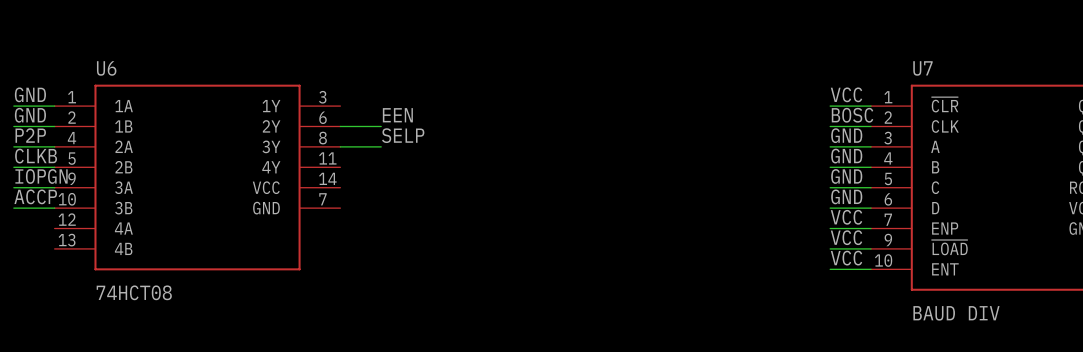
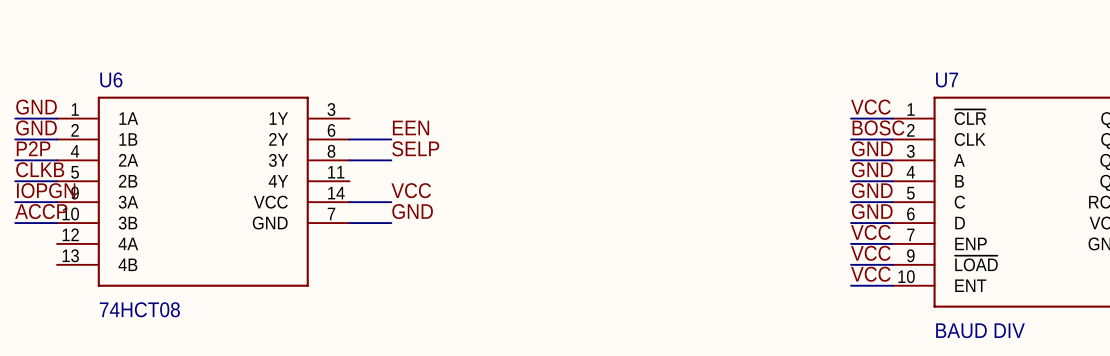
label: none -> VCC (411, 190)
wire: none -> (349, 202) (391, 202)
label: none -> GND (412, 211)
wire: none -> (349, 223) (391, 223)

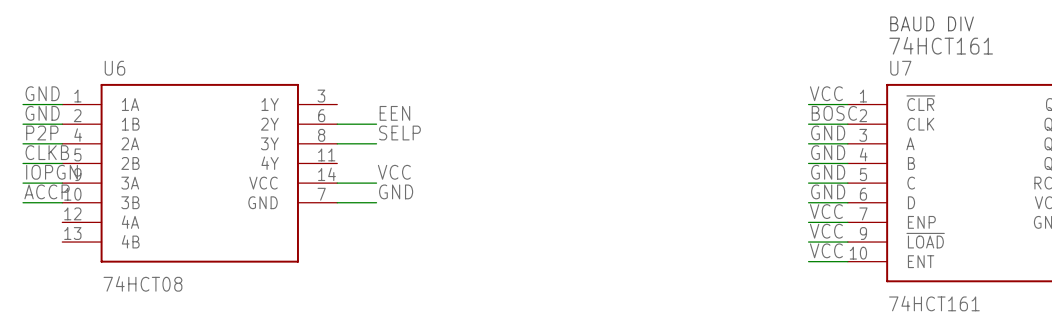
text: none -> BAUD DIV (932, 23)
text: none -> 74HCT161 (941, 45)
U7 value: BAUD DIV (980, 330) -> 74HCT161 (934, 303)

